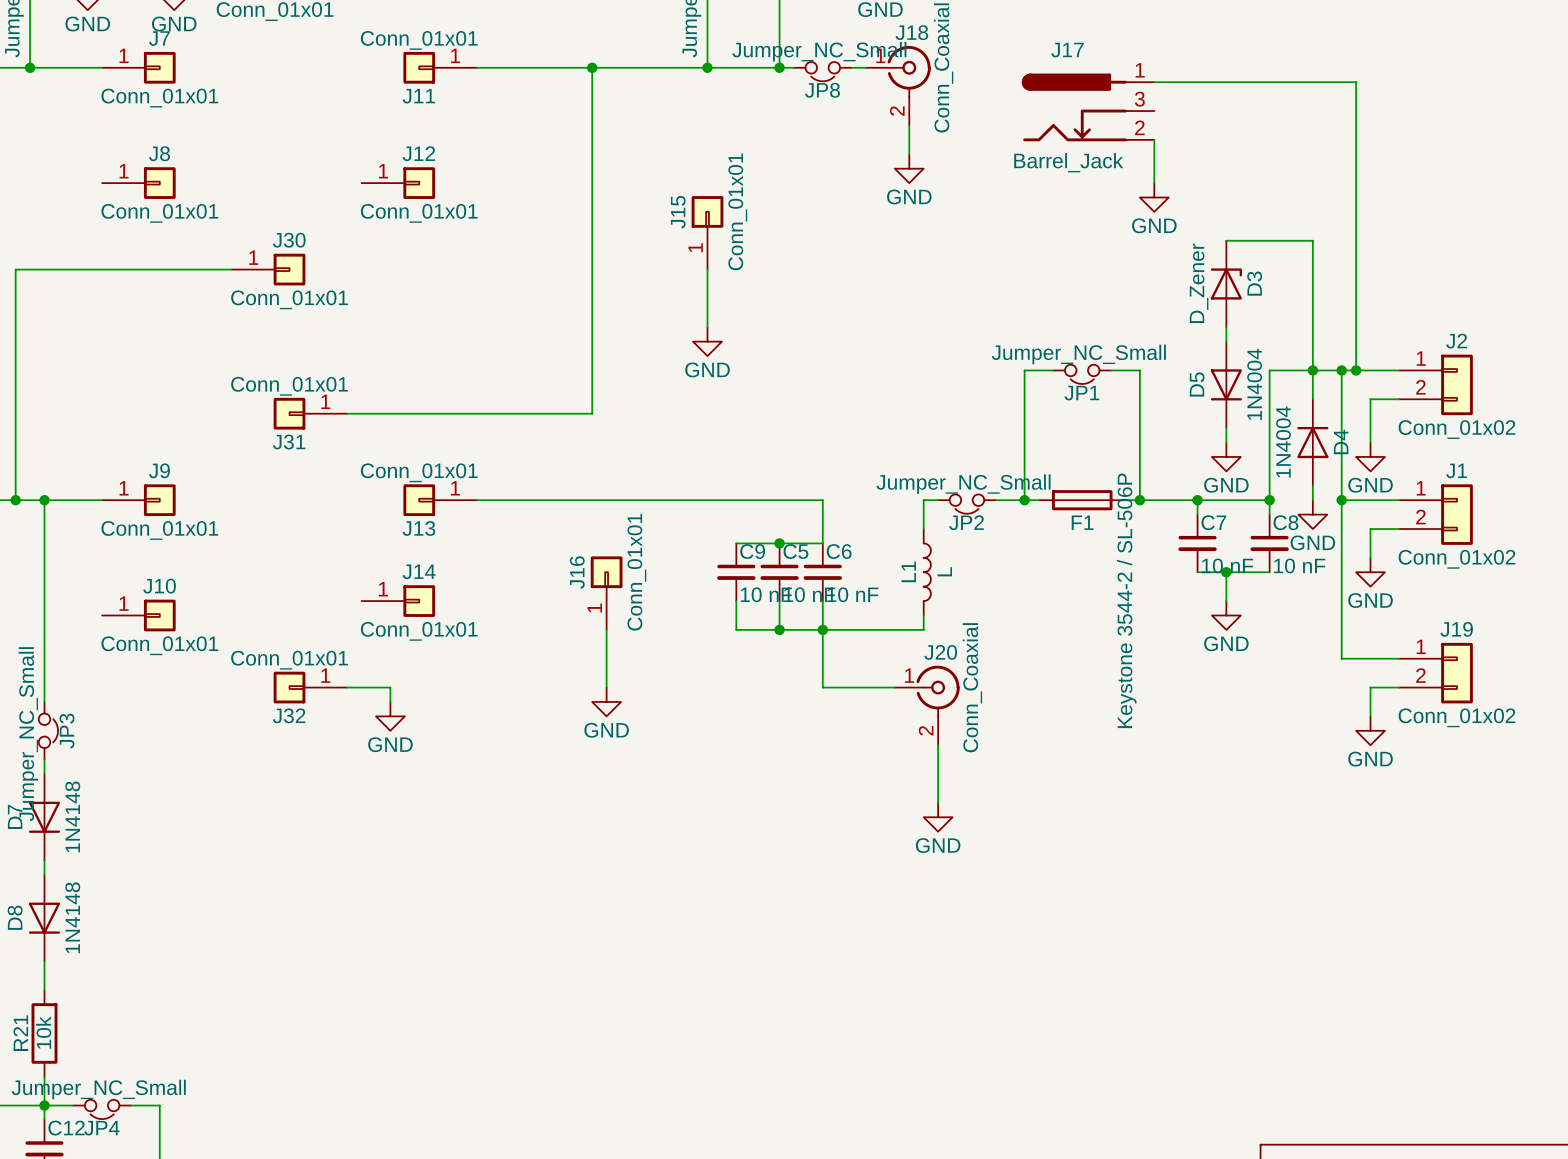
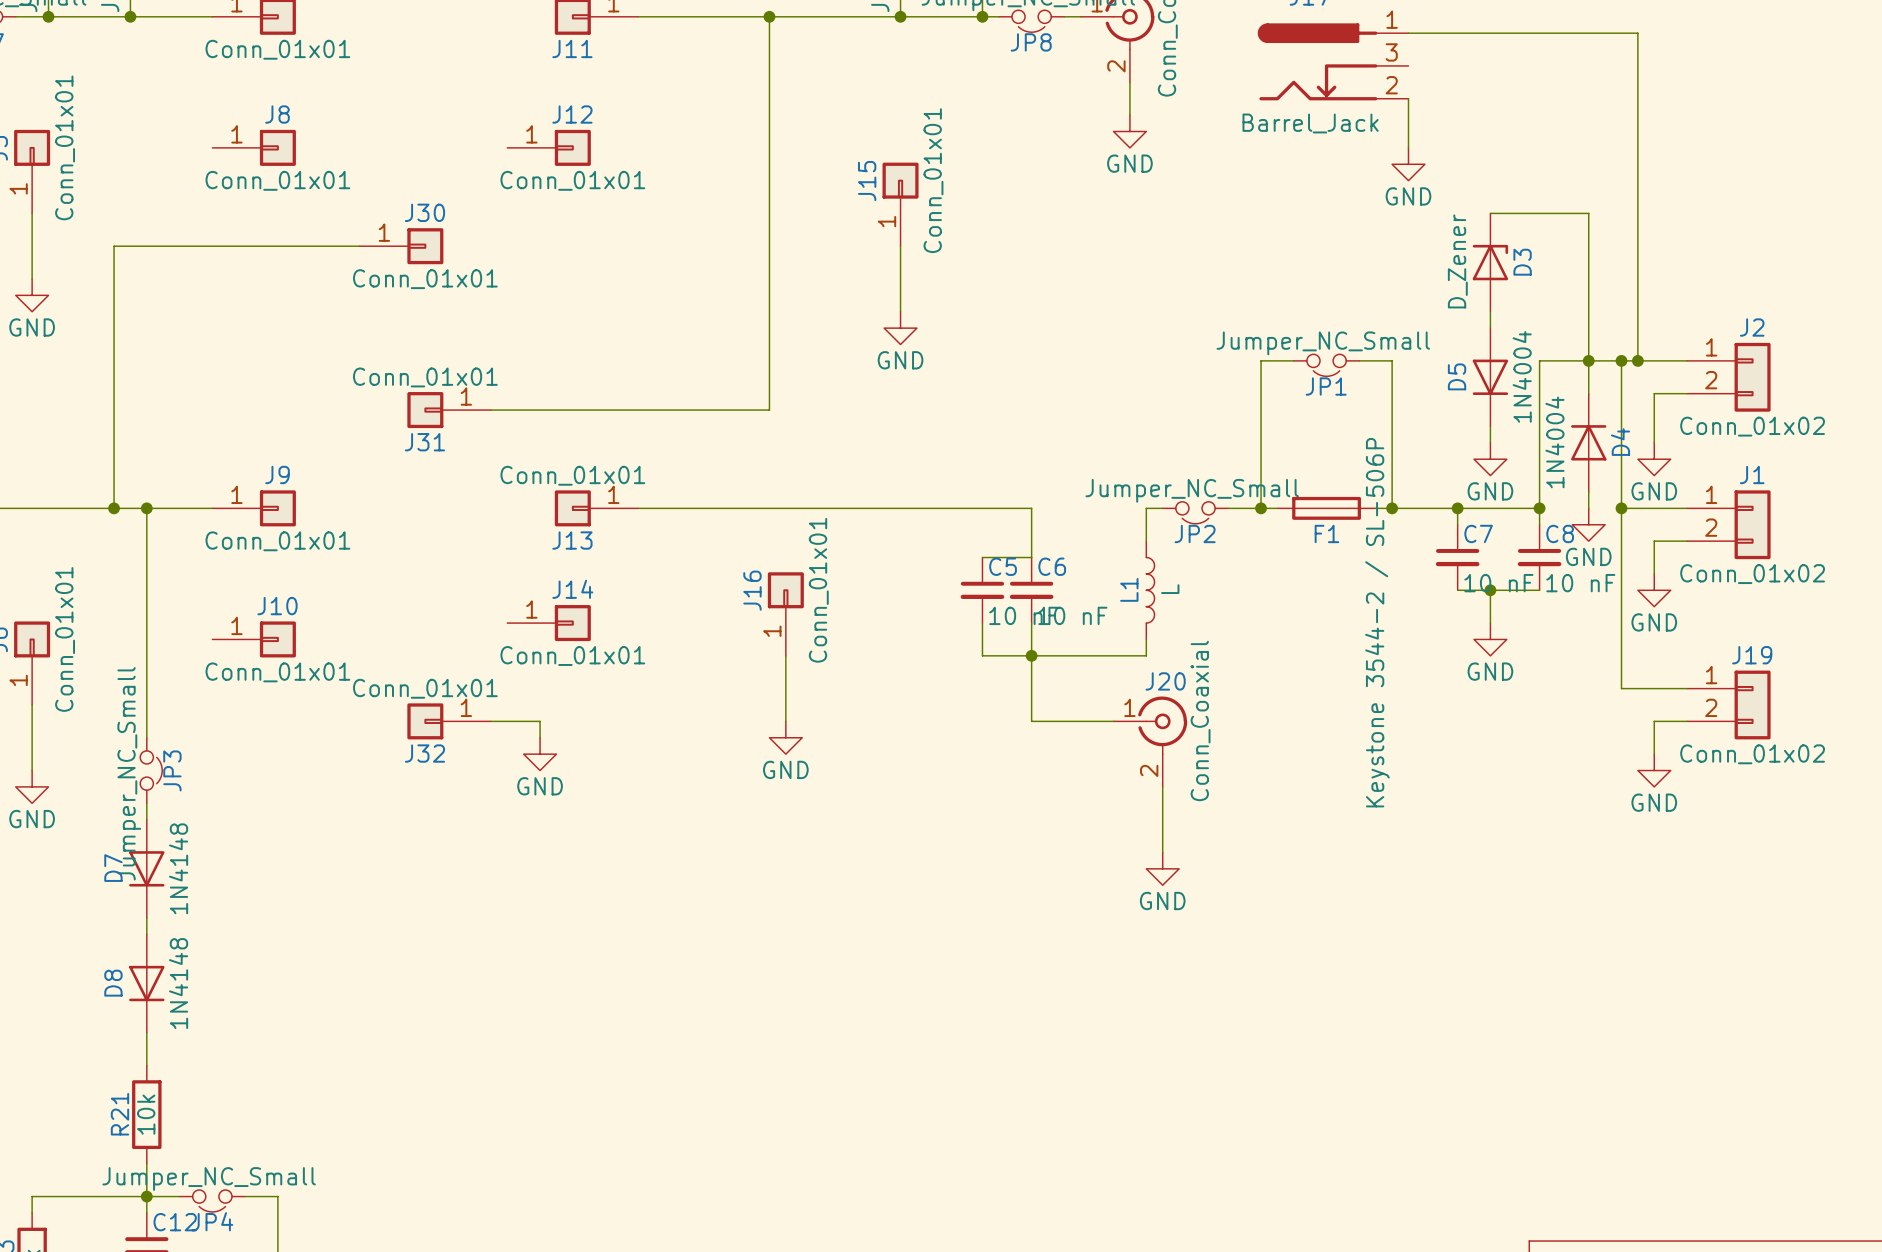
wire: (736, 543) (779, 543) -> none
junction: (779, 543) -> none
C9: 10 nF (736, 572) -> none
wire: (736, 601) (736, 629) (779, 629) -> none
junction: (779, 629) -> none

